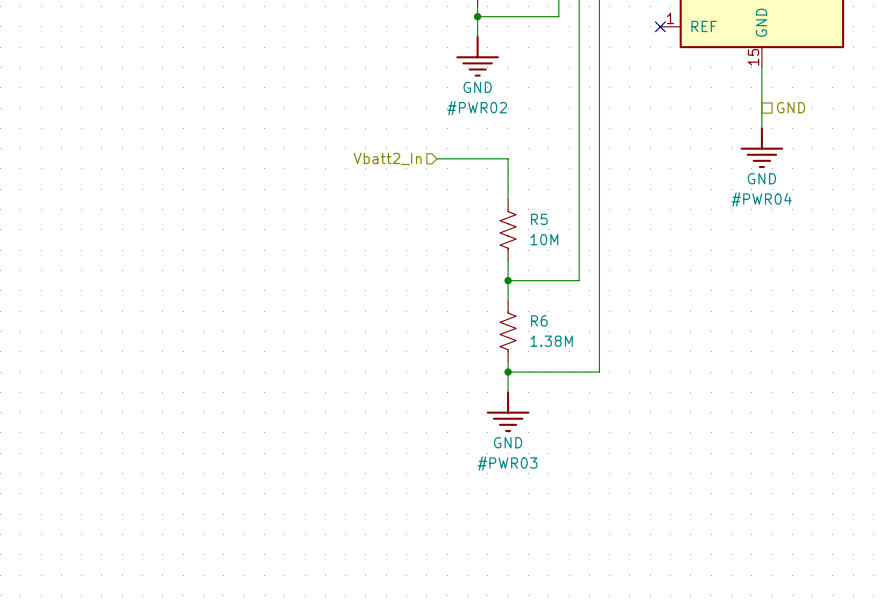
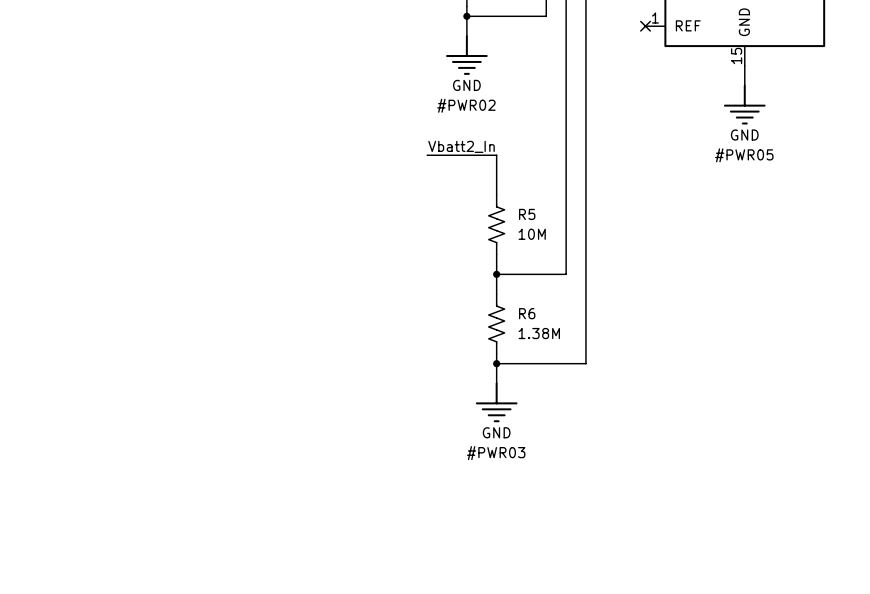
#PWR05: none -> GND (744, 104)
hierarchical label: GND (791, 107) -> none
#PWR04: GND (761, 147) -> none
label: none -> Vbatt2_In (461, 146)
hierarchical label: Vbatt2_In (387, 158) -> none

